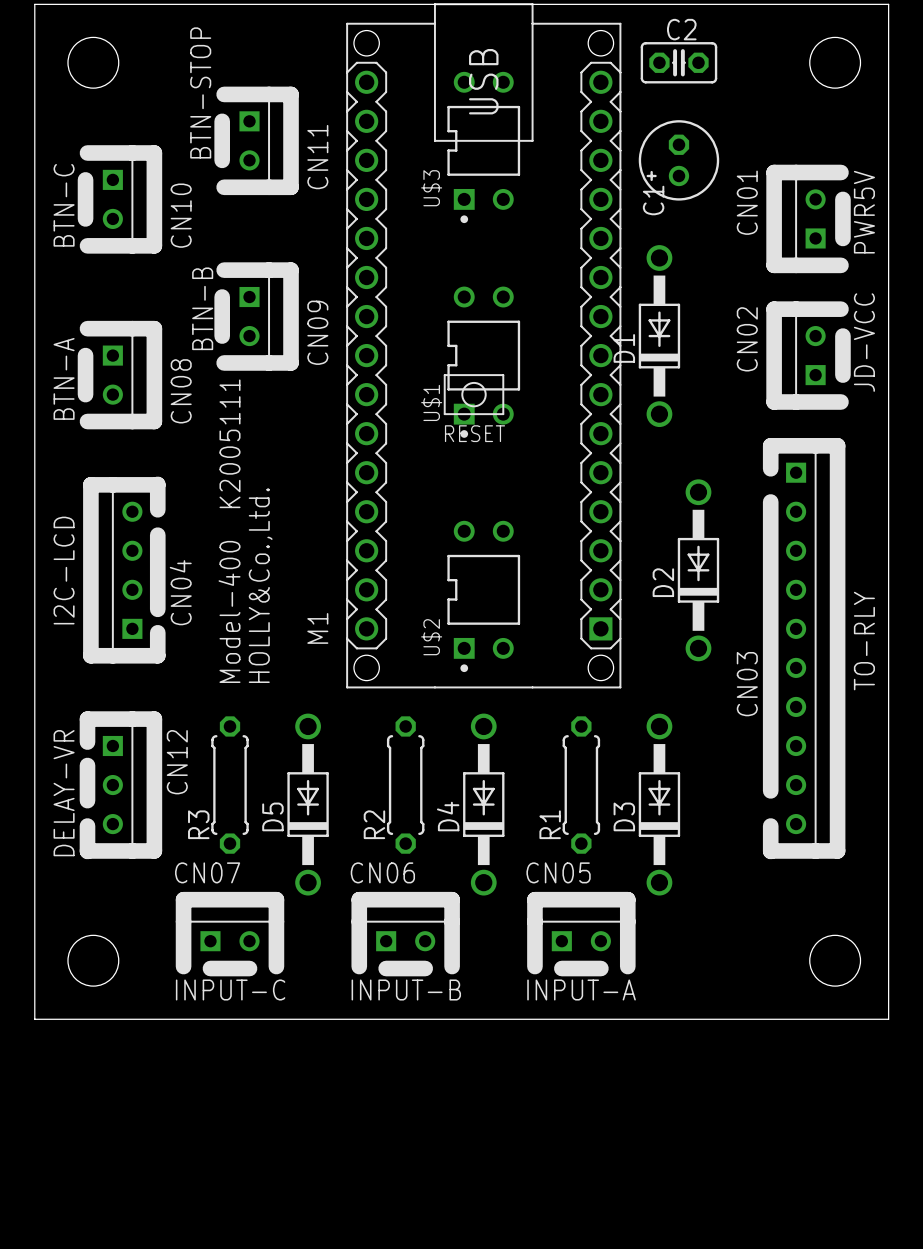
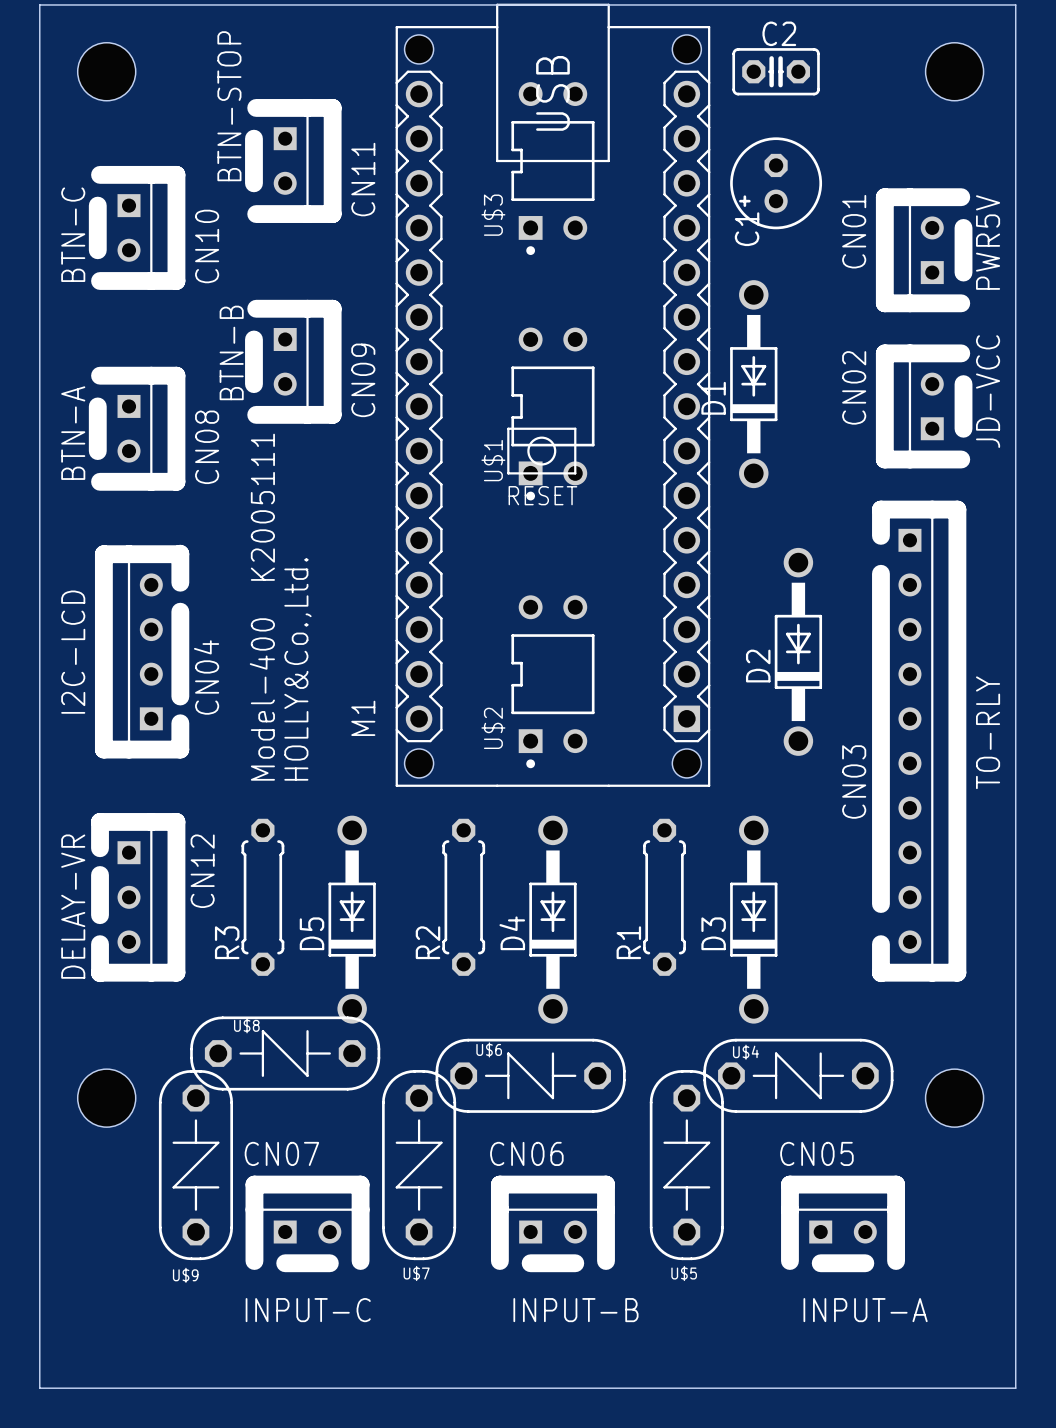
U$8: none -> (285, 1053)
CN07 position: (230, 934) -> (307, 1223)
CN06 position: (405, 934) -> (552, 1223)
CN05 position: (581, 934) -> (843, 1223)
U$6: none -> (530, 1075)
U$4: none -> (798, 1075)
CN07 value position: INPUT-C (230, 990) -> INPUT-C (308, 1310)
CN06 value position: INPUT-B (406, 990) -> INPUT-B (575, 1310)
CN05 value position: INPUT-A (581, 990) -> INPUT-A (865, 1310)
board edge: (34, 1019) (888, 1019) -> (39, 1165) (39, 1388) (1015, 1388) (1015, 1165)
U$9: none -> (195, 1165)
U$7: none -> (419, 1165)
U$5: none -> (686, 1165)

